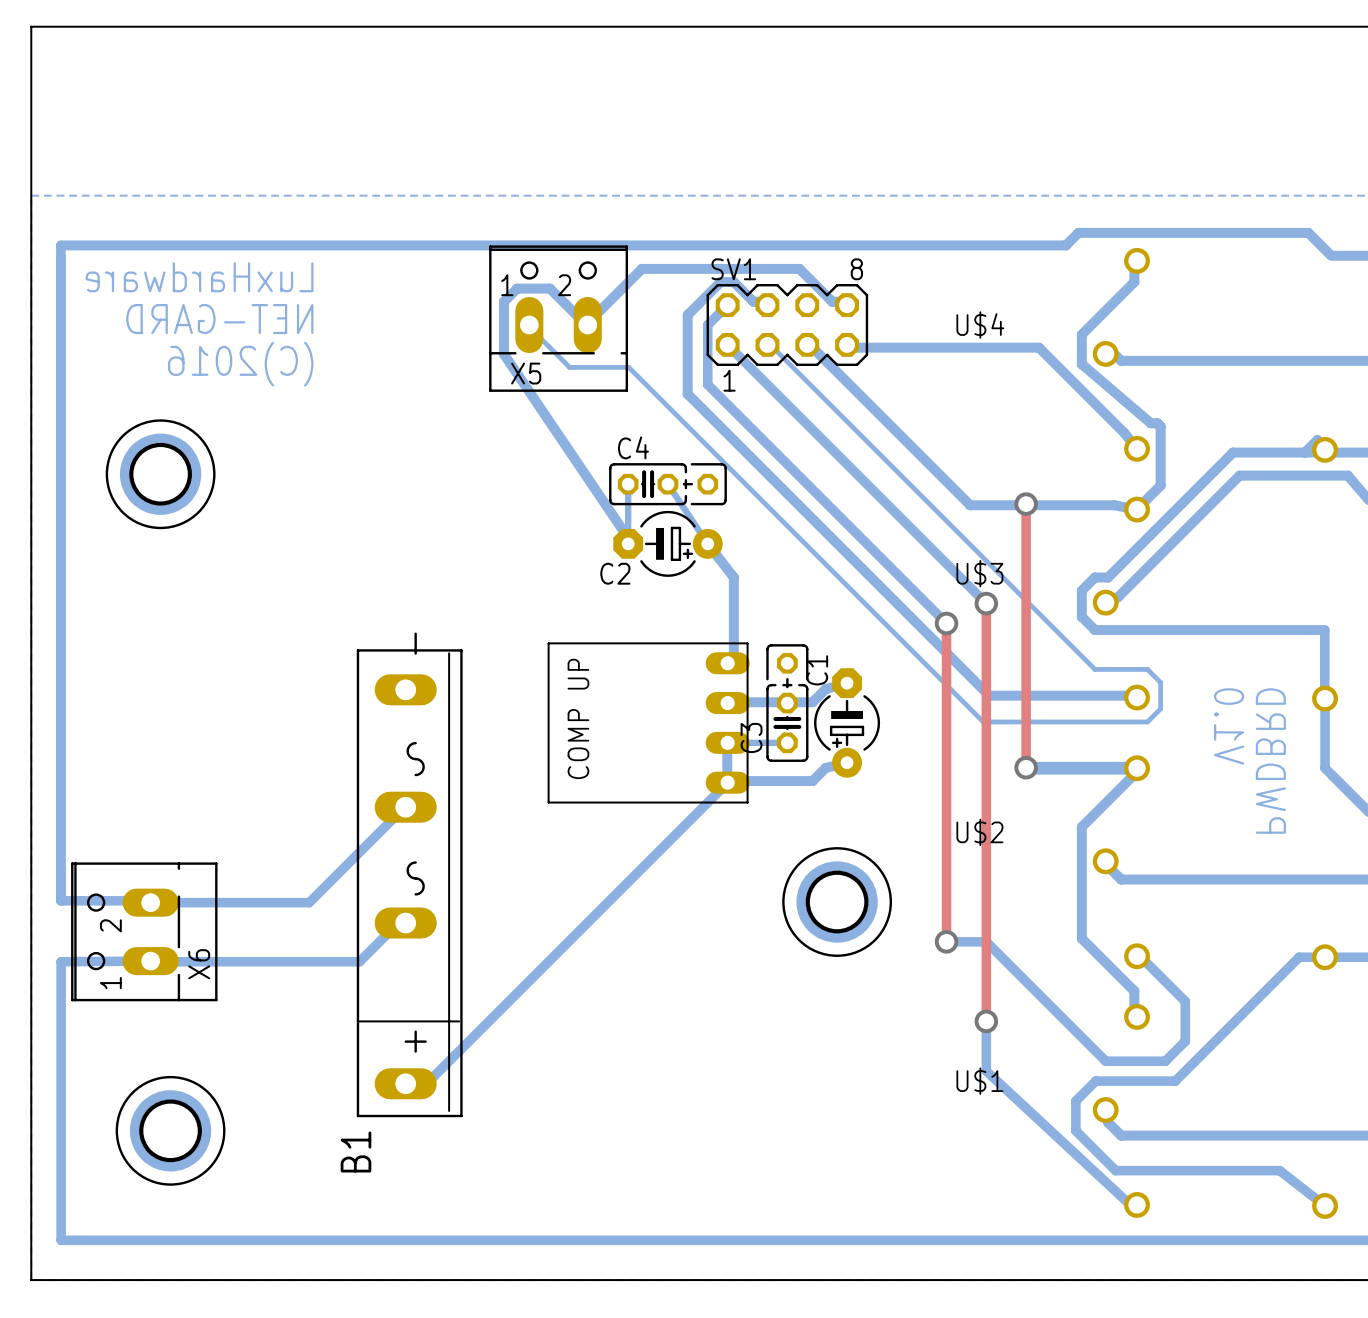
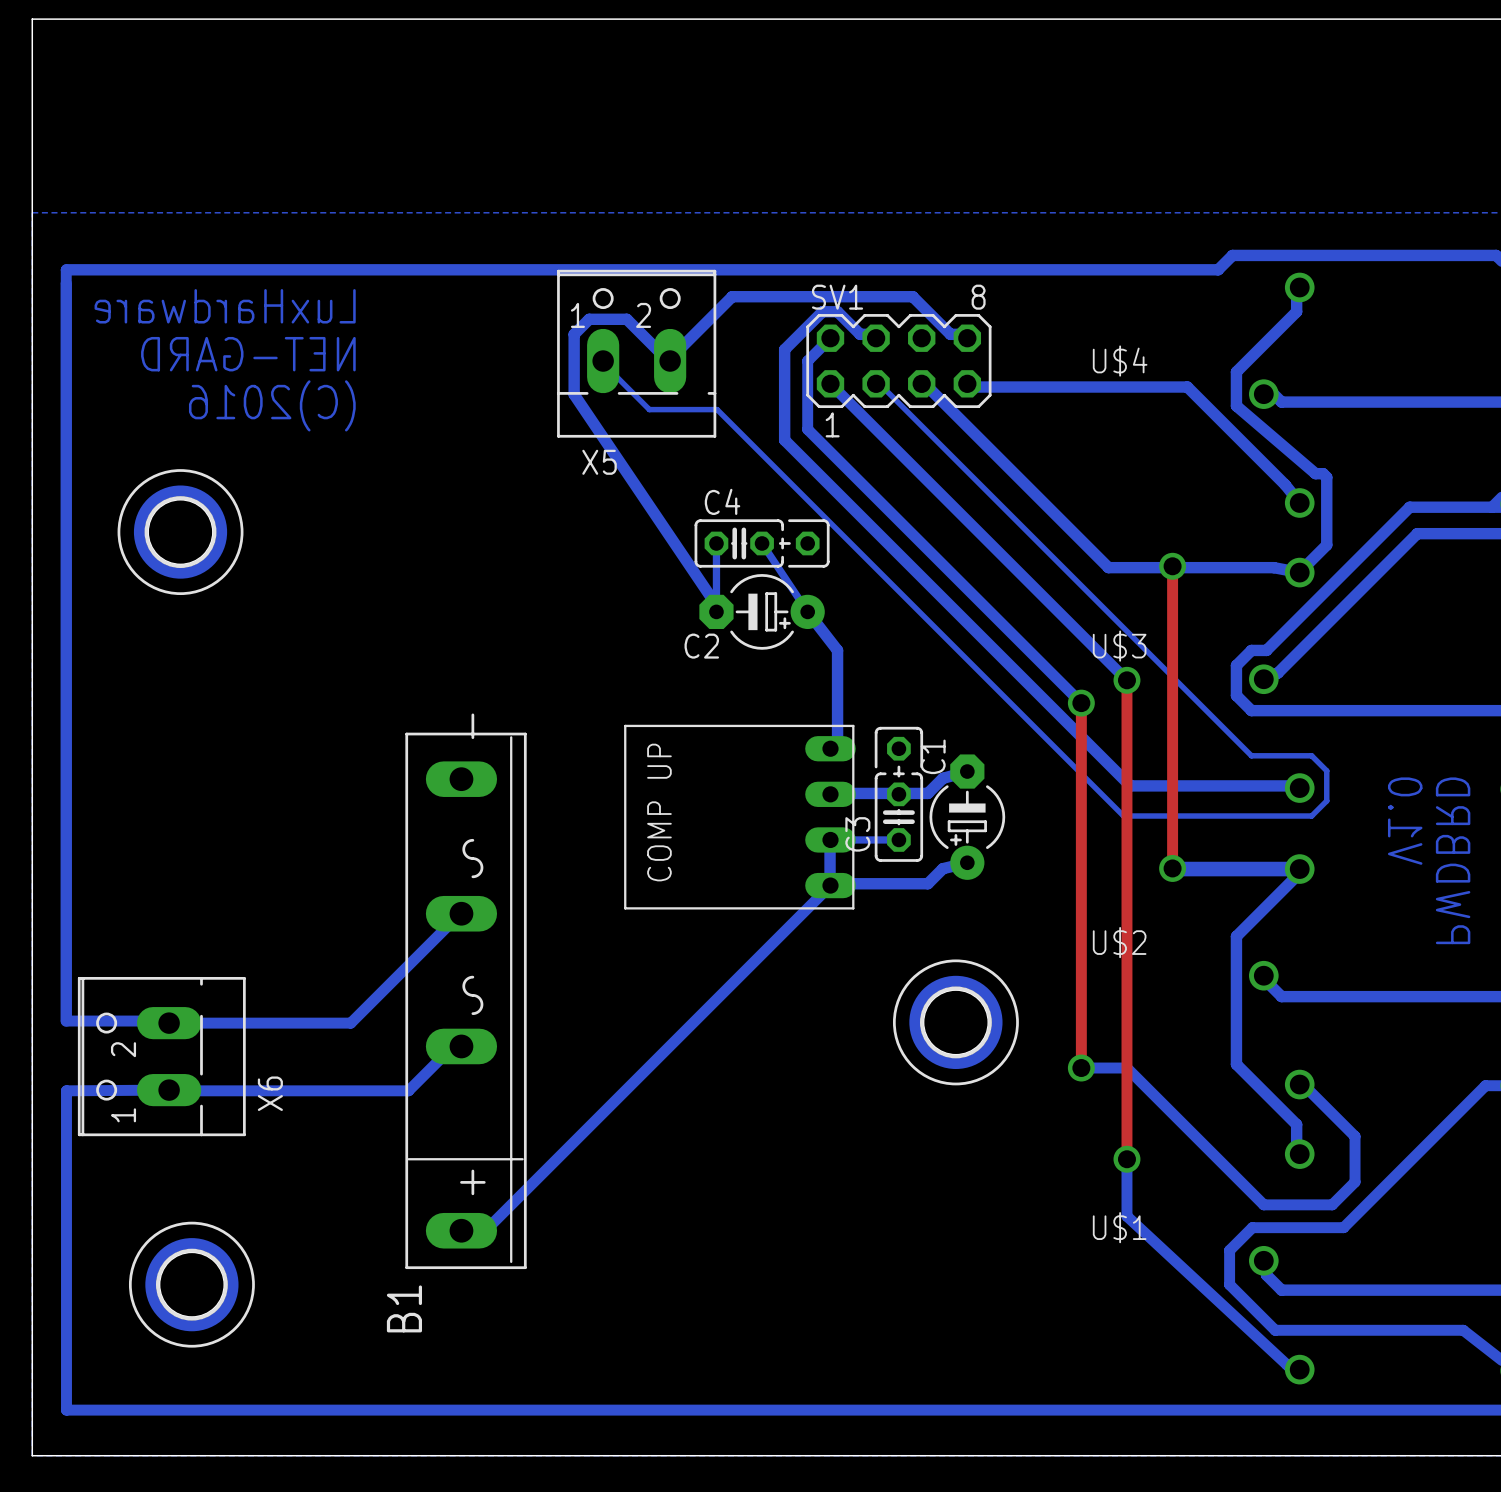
X5 name position: X5 (526, 373) -> X5 (599, 462)
X6 name position: X6 (199, 964) -> X6 (270, 1093)

